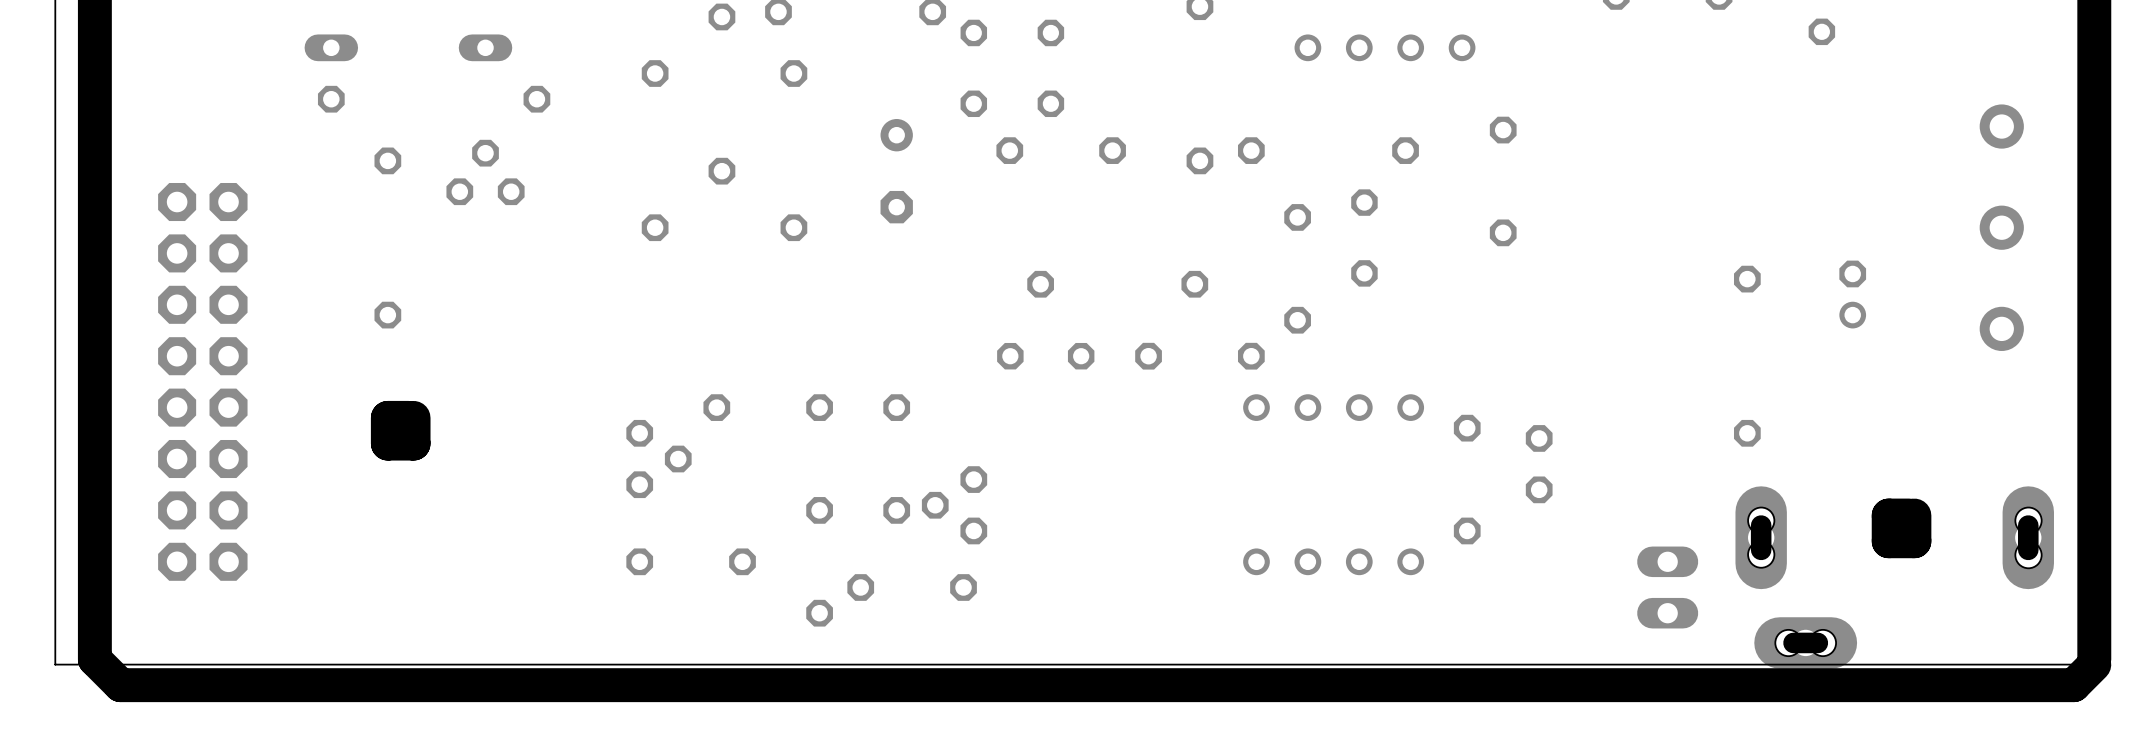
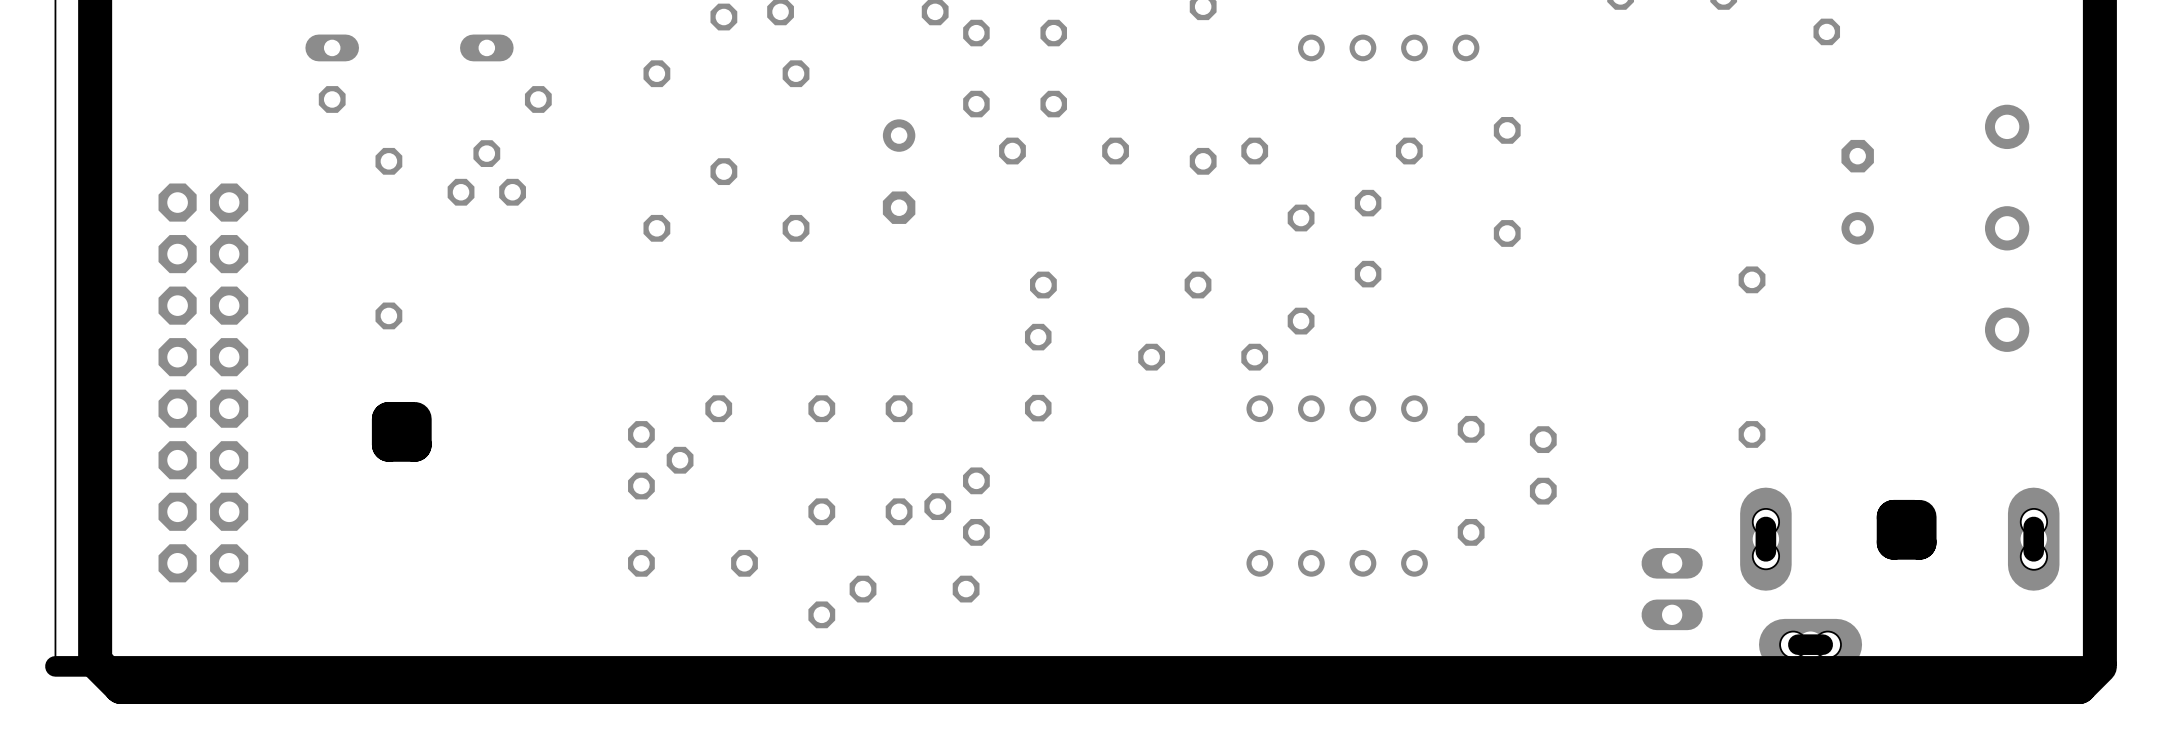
part: none -> (1857, 192)
part: (1852, 294) -> none
part rotation: 0° (1045, 356) -> 90° clockwise (1038, 372)
board edge width: thin (2078, 664) (55, 664) -> thick (2084, 666) (55, 666)

